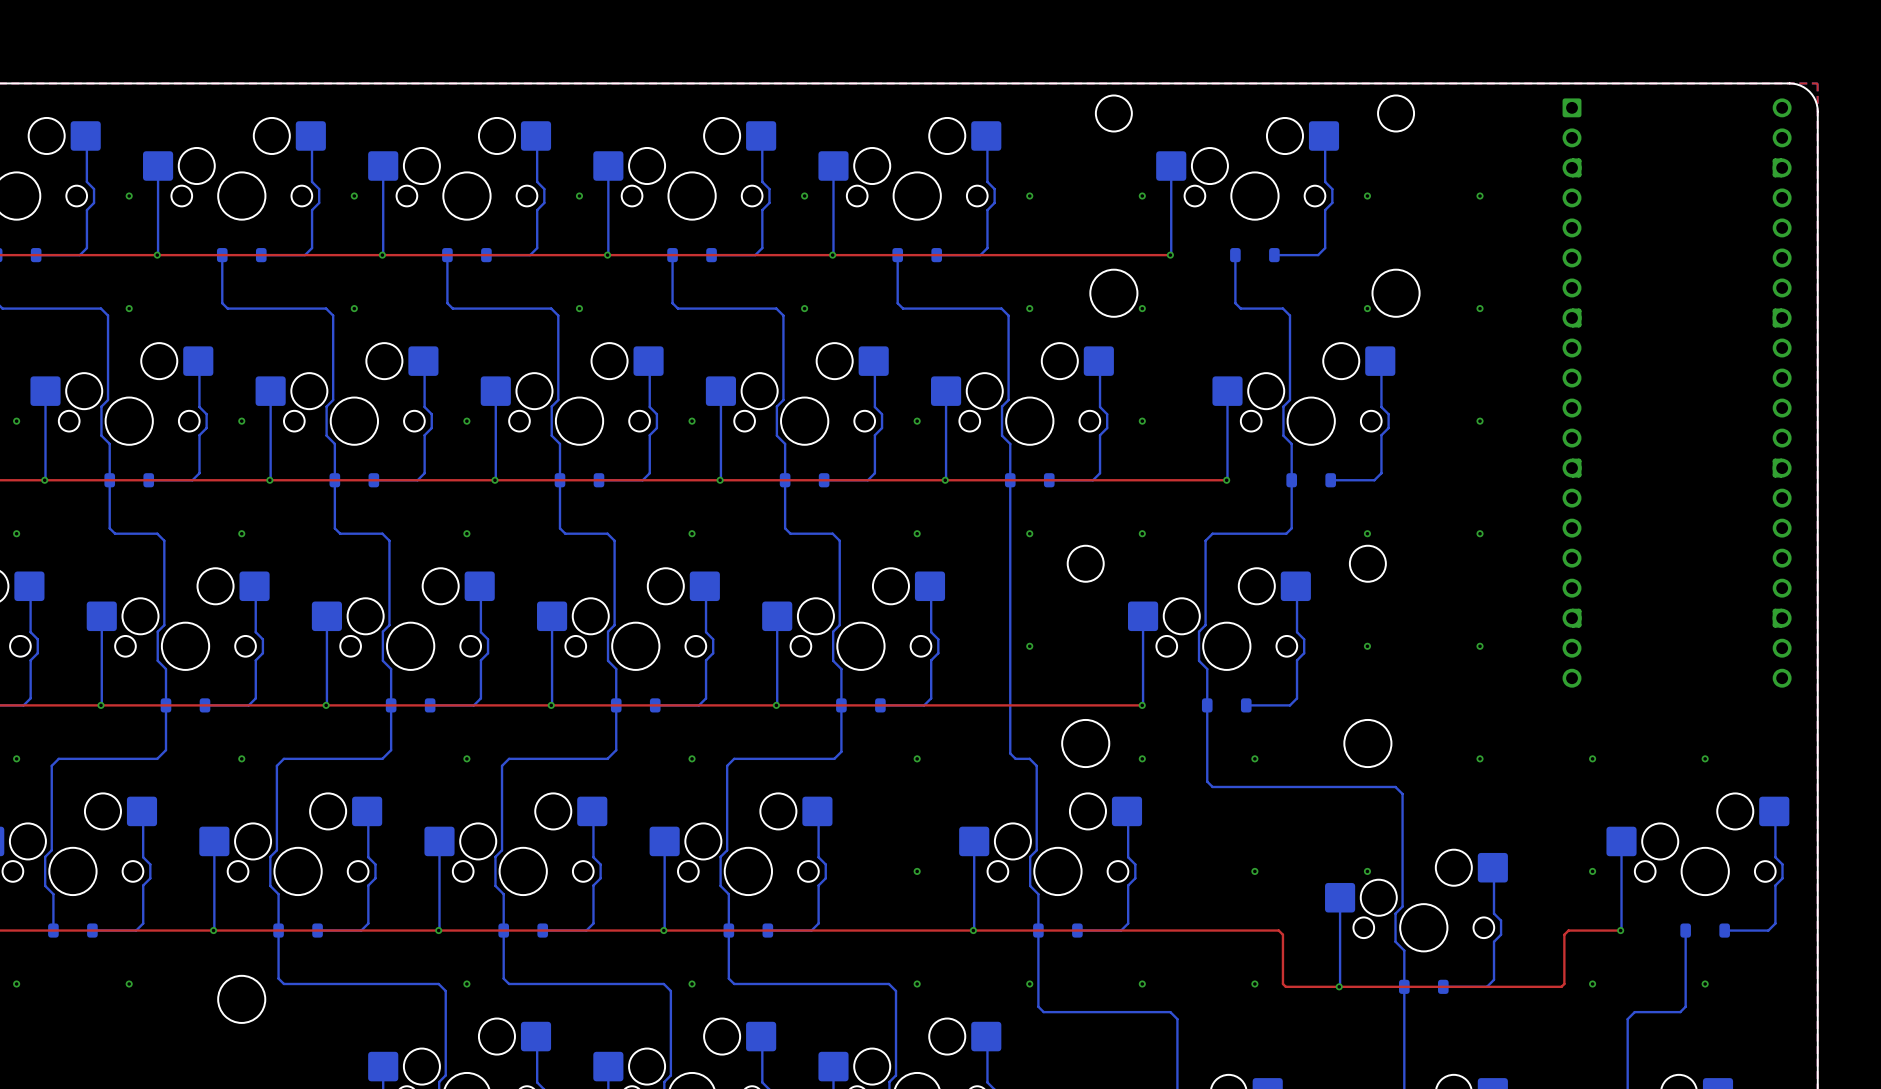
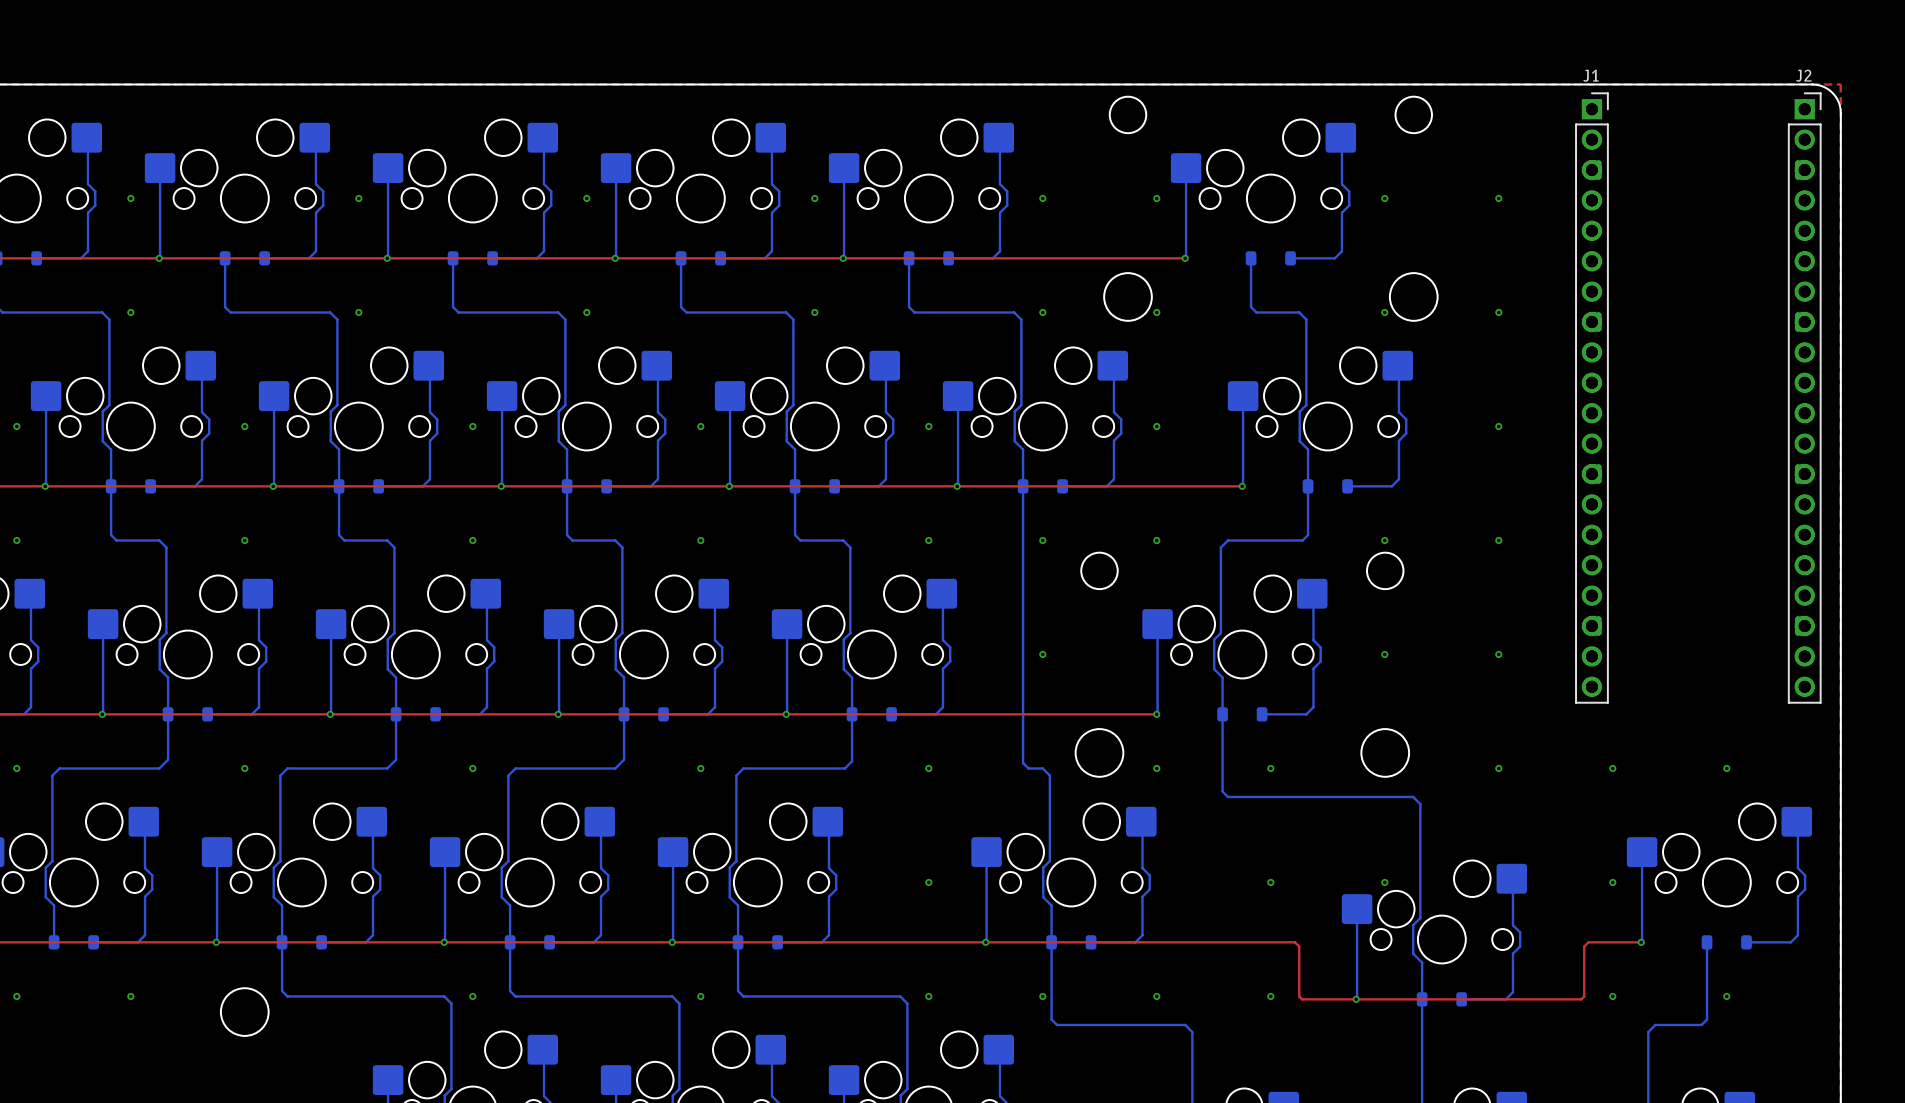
J1: none -> (1591, 398)
J2: none -> (1804, 398)

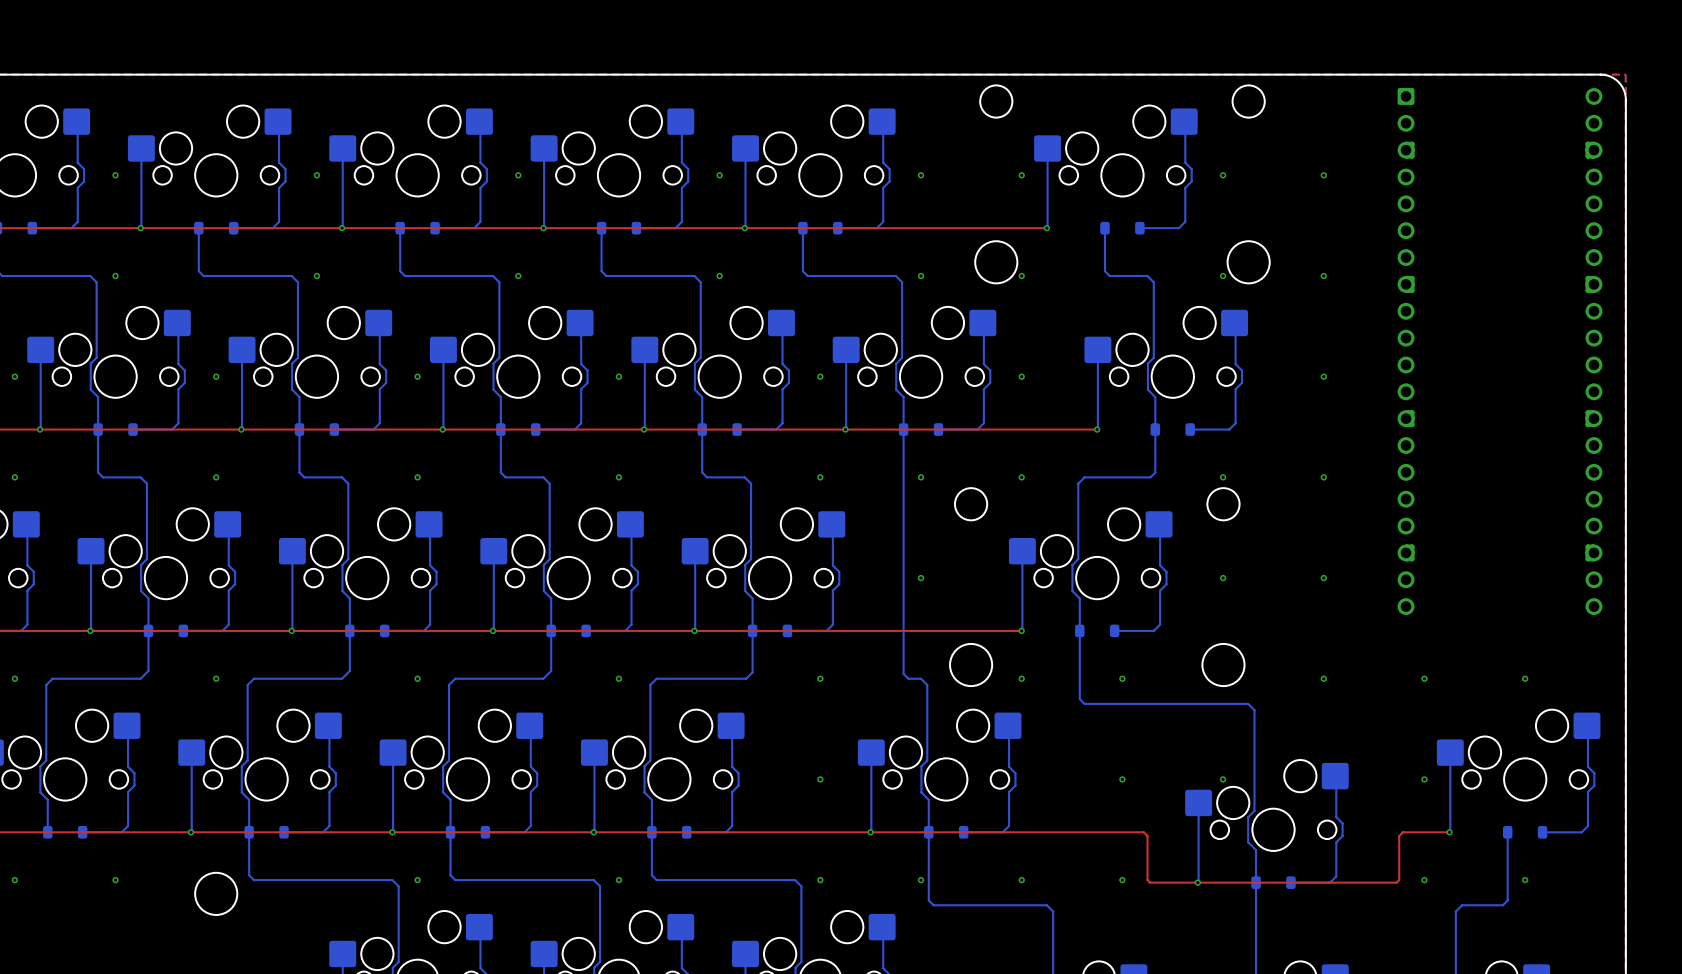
J1: (1591, 398) -> none
J2: (1804, 398) -> none

